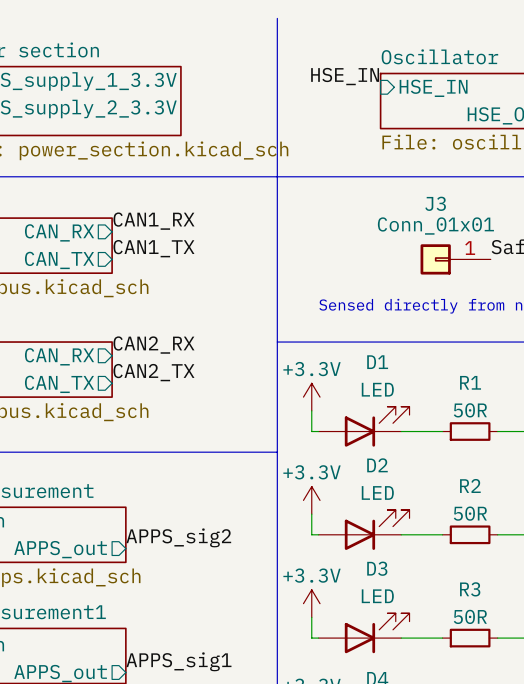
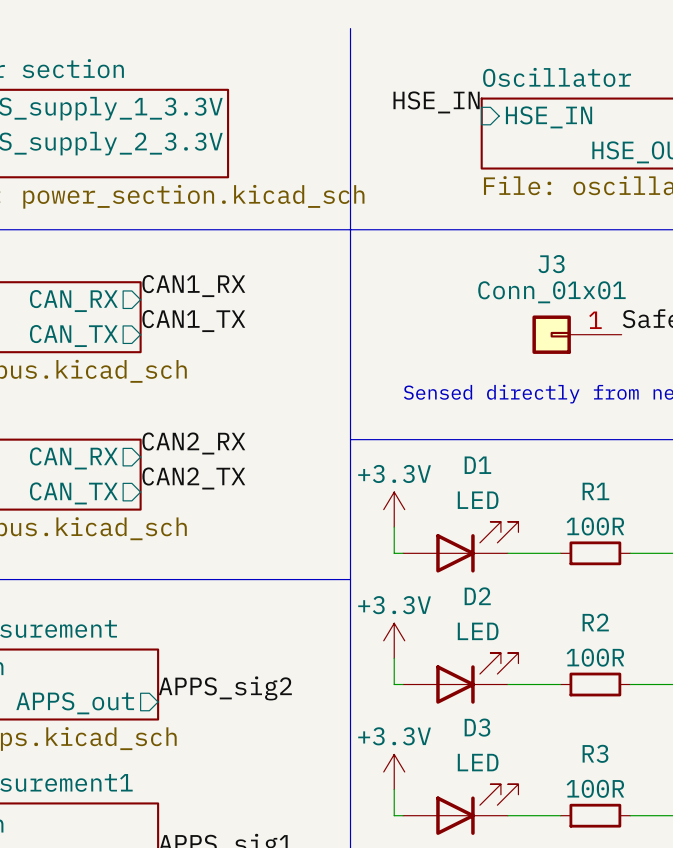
R1 value: 50R (470, 410) -> 100R (595, 526)
R2 value: 50R (470, 513) -> 100R (595, 657)
R3 value: 50R (470, 616) -> 100R (595, 788)

